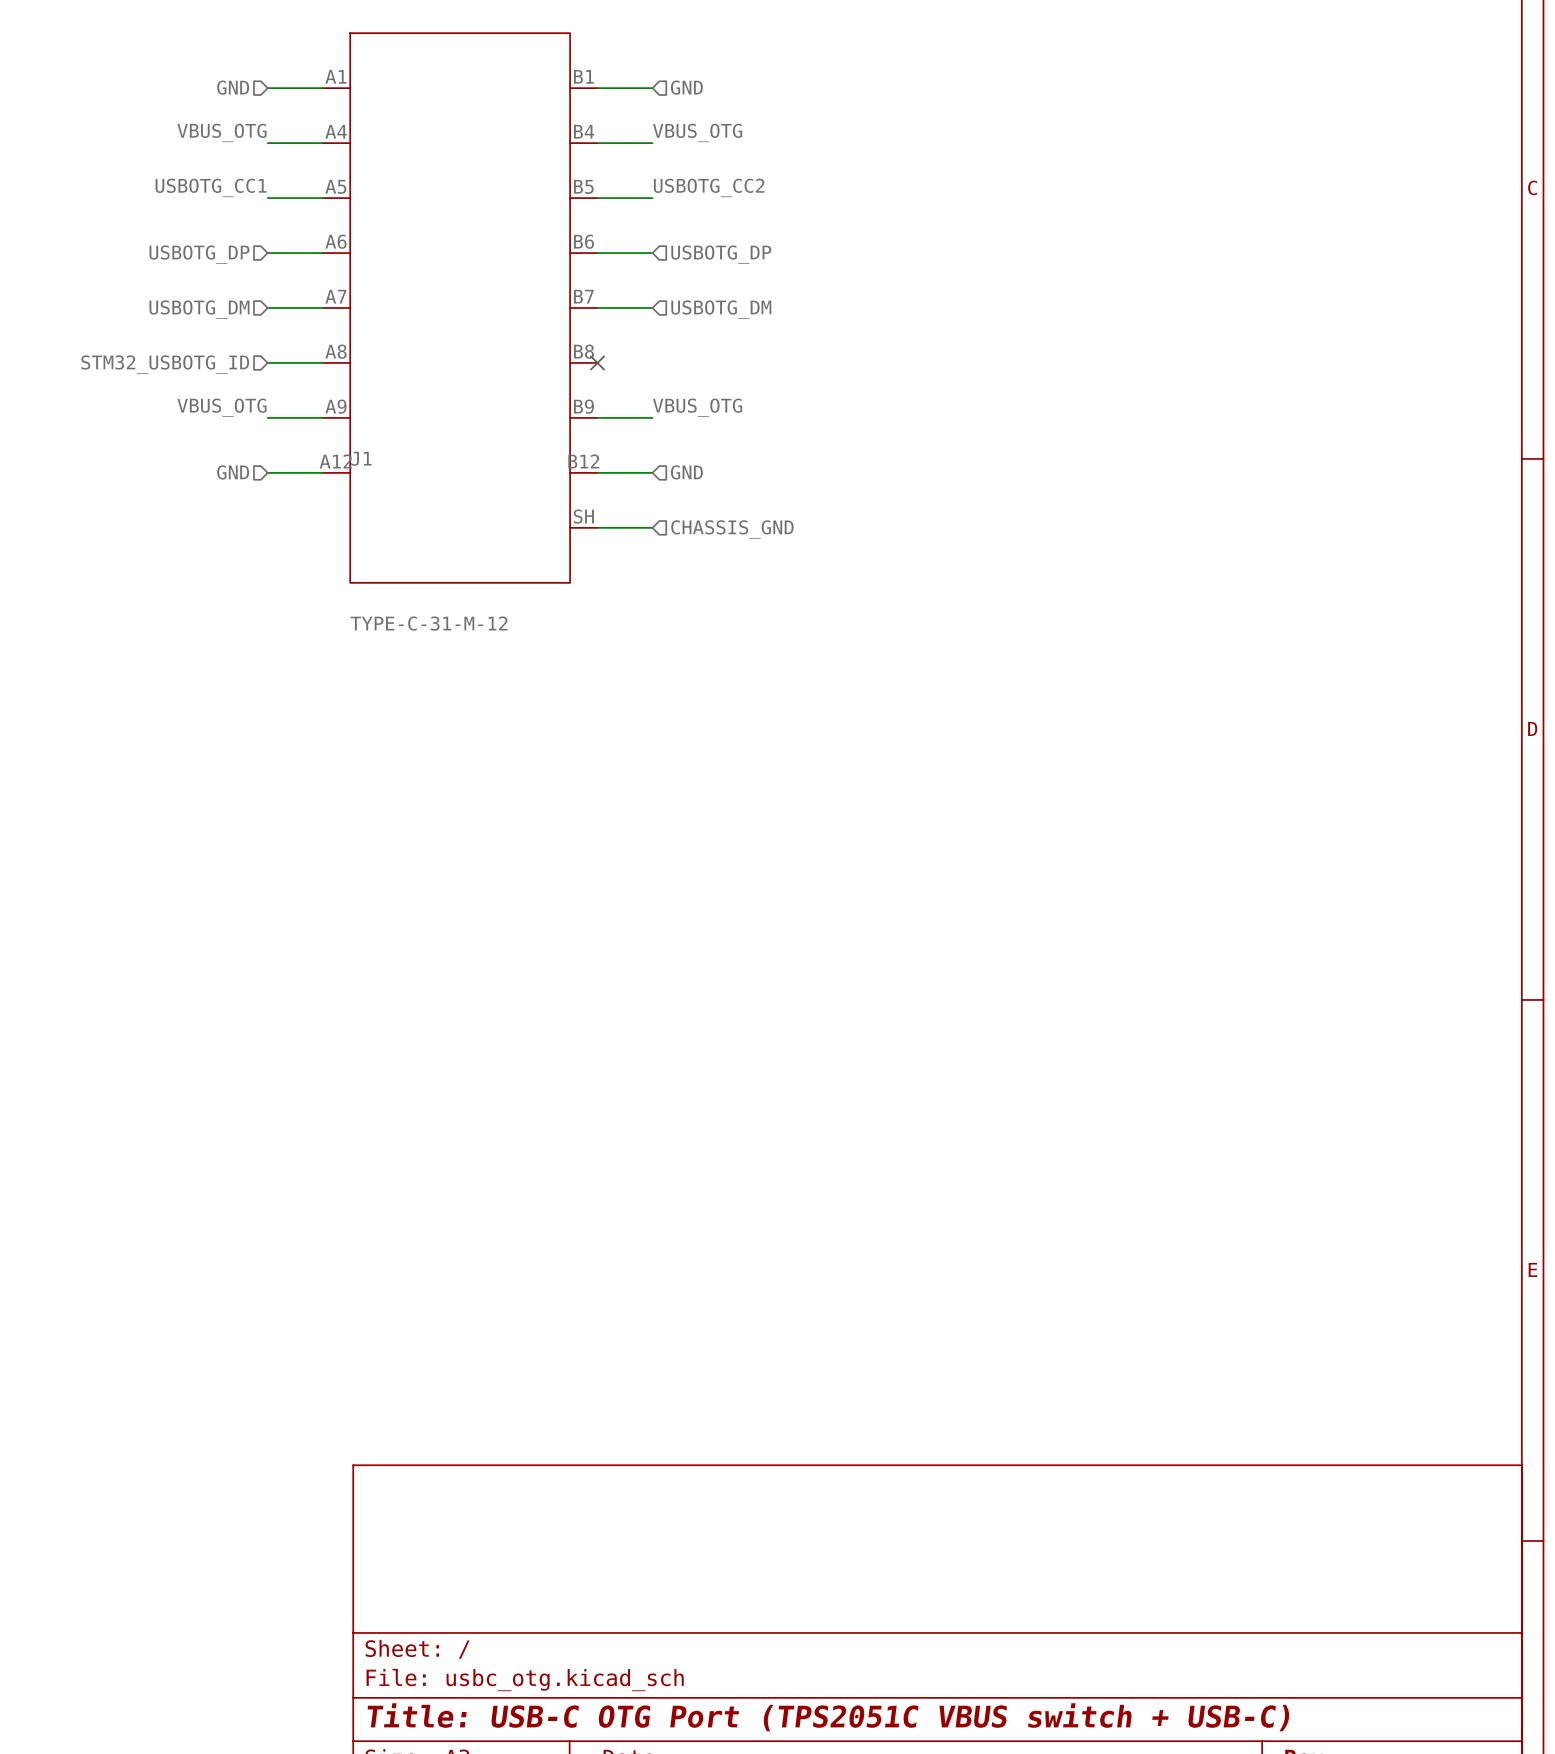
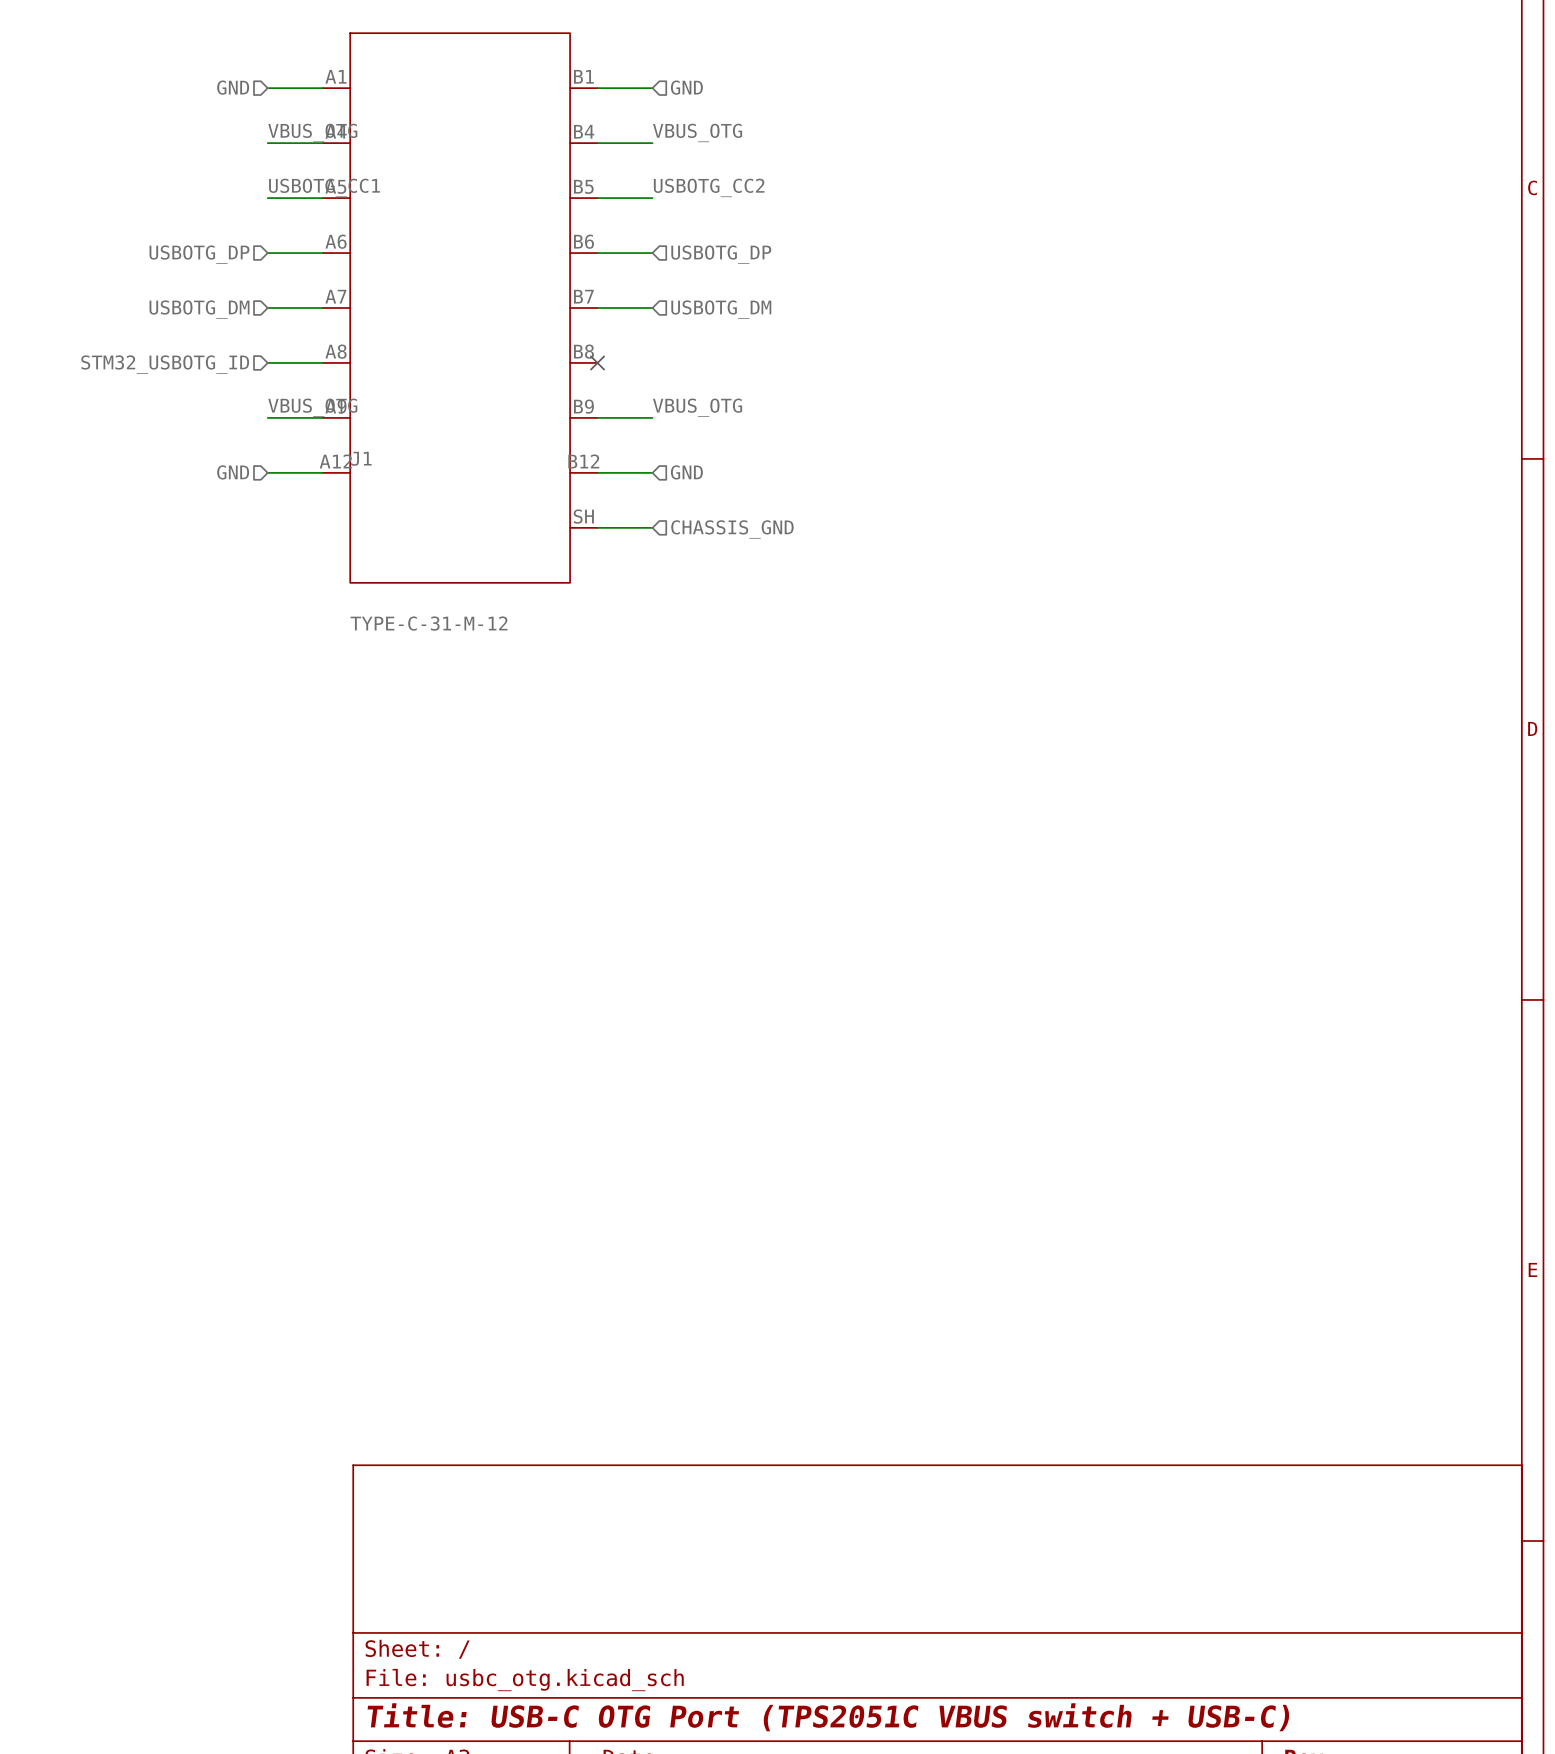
label position: VBUS_OTG (222, 132) -> VBUS_OTG (312, 132)
label position: USBOTG_CC1 (211, 187) -> USBOTG_CC1 (324, 187)
label position: VBUS_OTG (222, 407) -> VBUS_OTG (312, 407)

